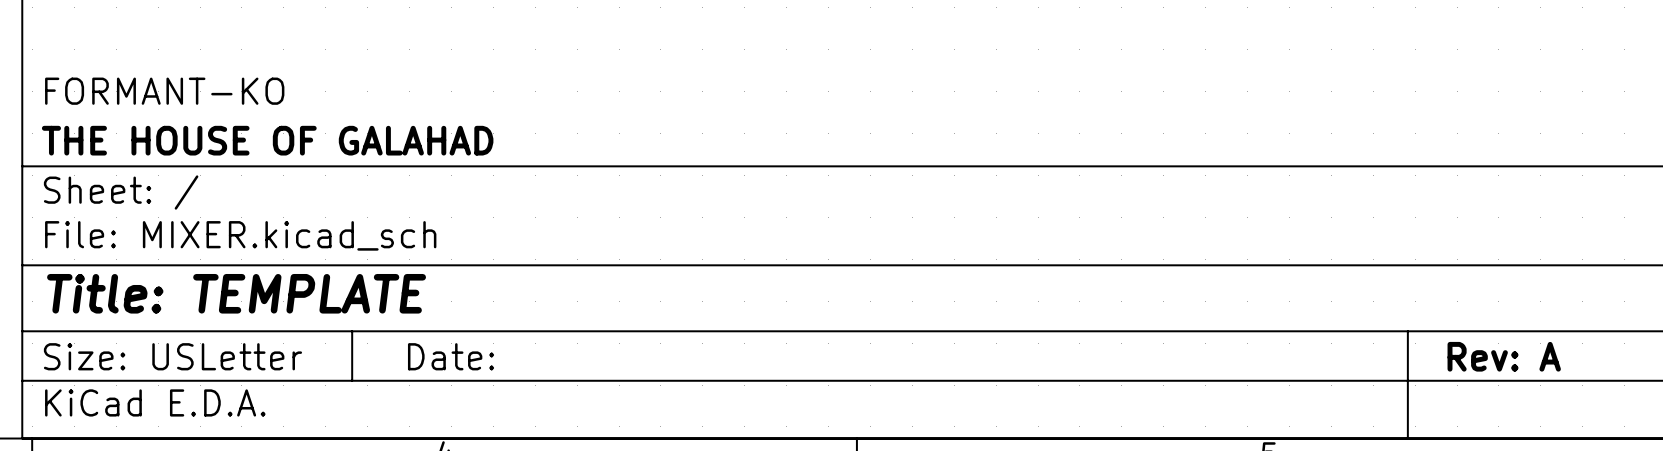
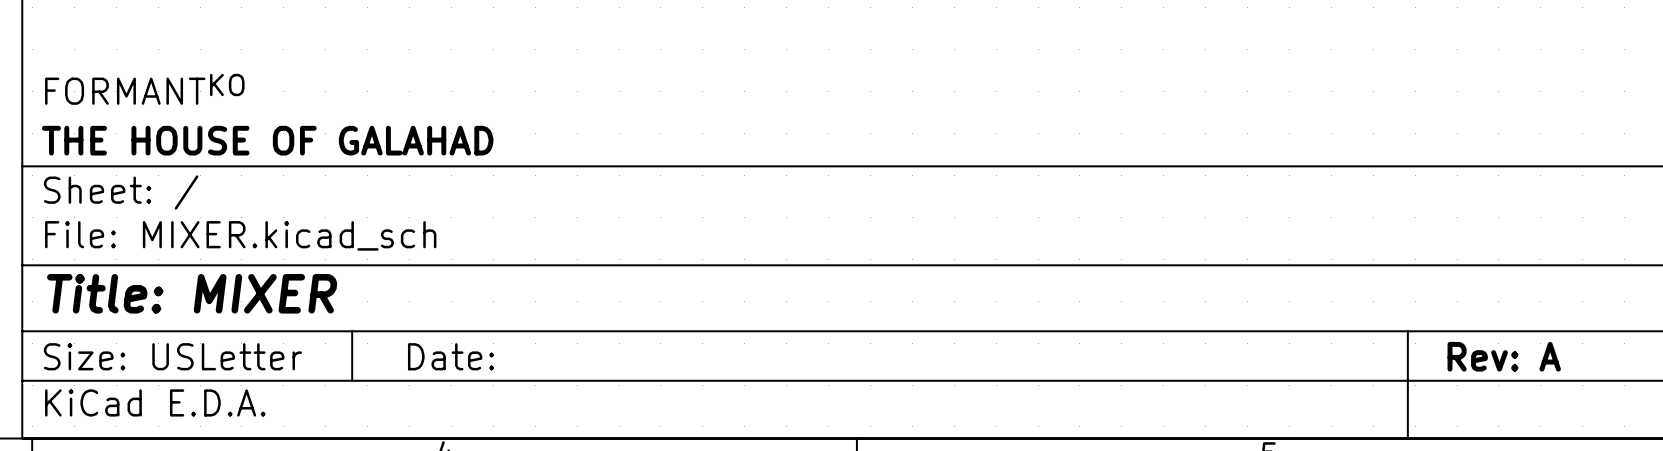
title block: FORMANT-KO (164, 91) -> FORMANTKO (144, 89)
title block: Title: TEMPLATE (236, 293) -> Title: MIXER (192, 293)

